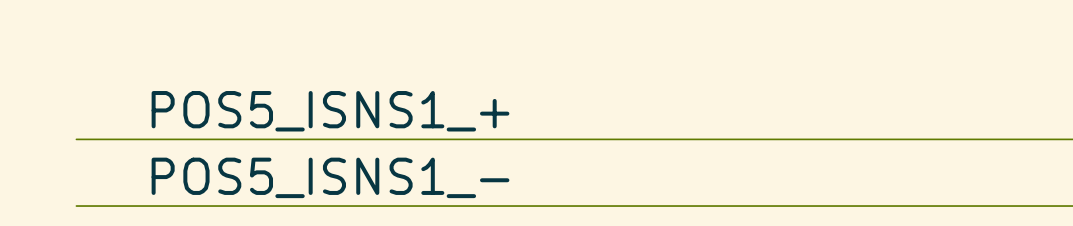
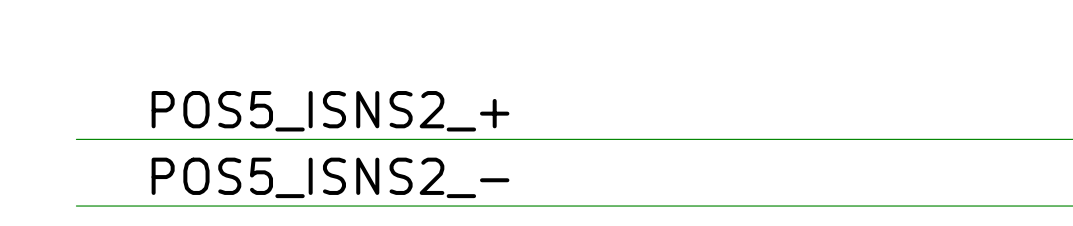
label: POS5_ISNS1_+ (330, 111) -> POS5_ISNS2_+ (330, 111)
label: POS5_ISNS1_- (330, 177) -> POS5_ISNS2_- (330, 177)

